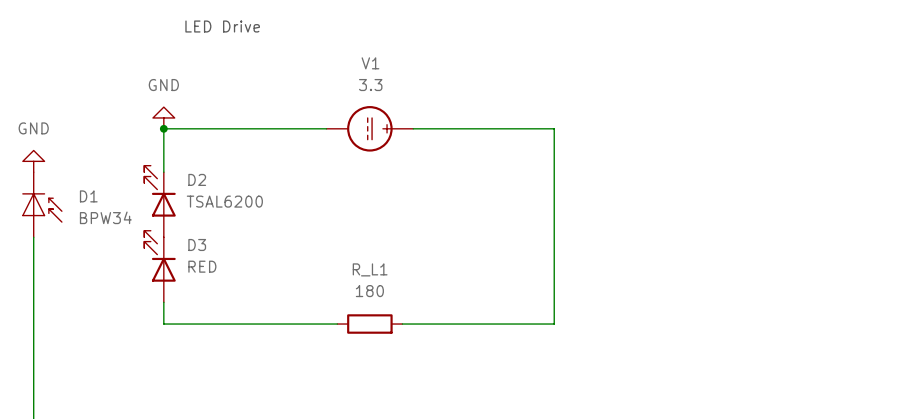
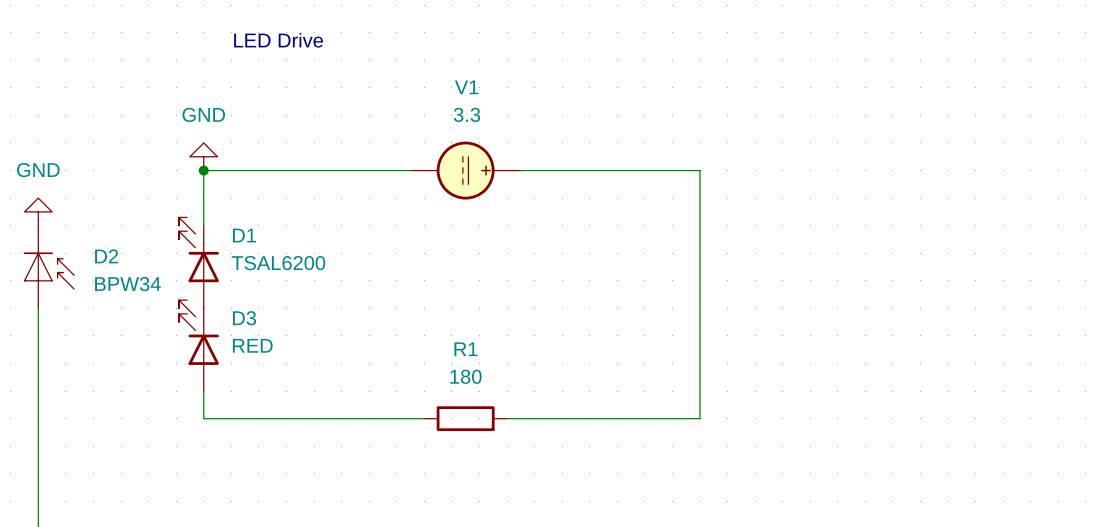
D2 name: D2 (197, 179) -> D1 (244, 235)
D1 name: D1 (88, 196) -> D2 (106, 256)
R_L1 name: R_L1 (370, 269) -> R1 (465, 349)

